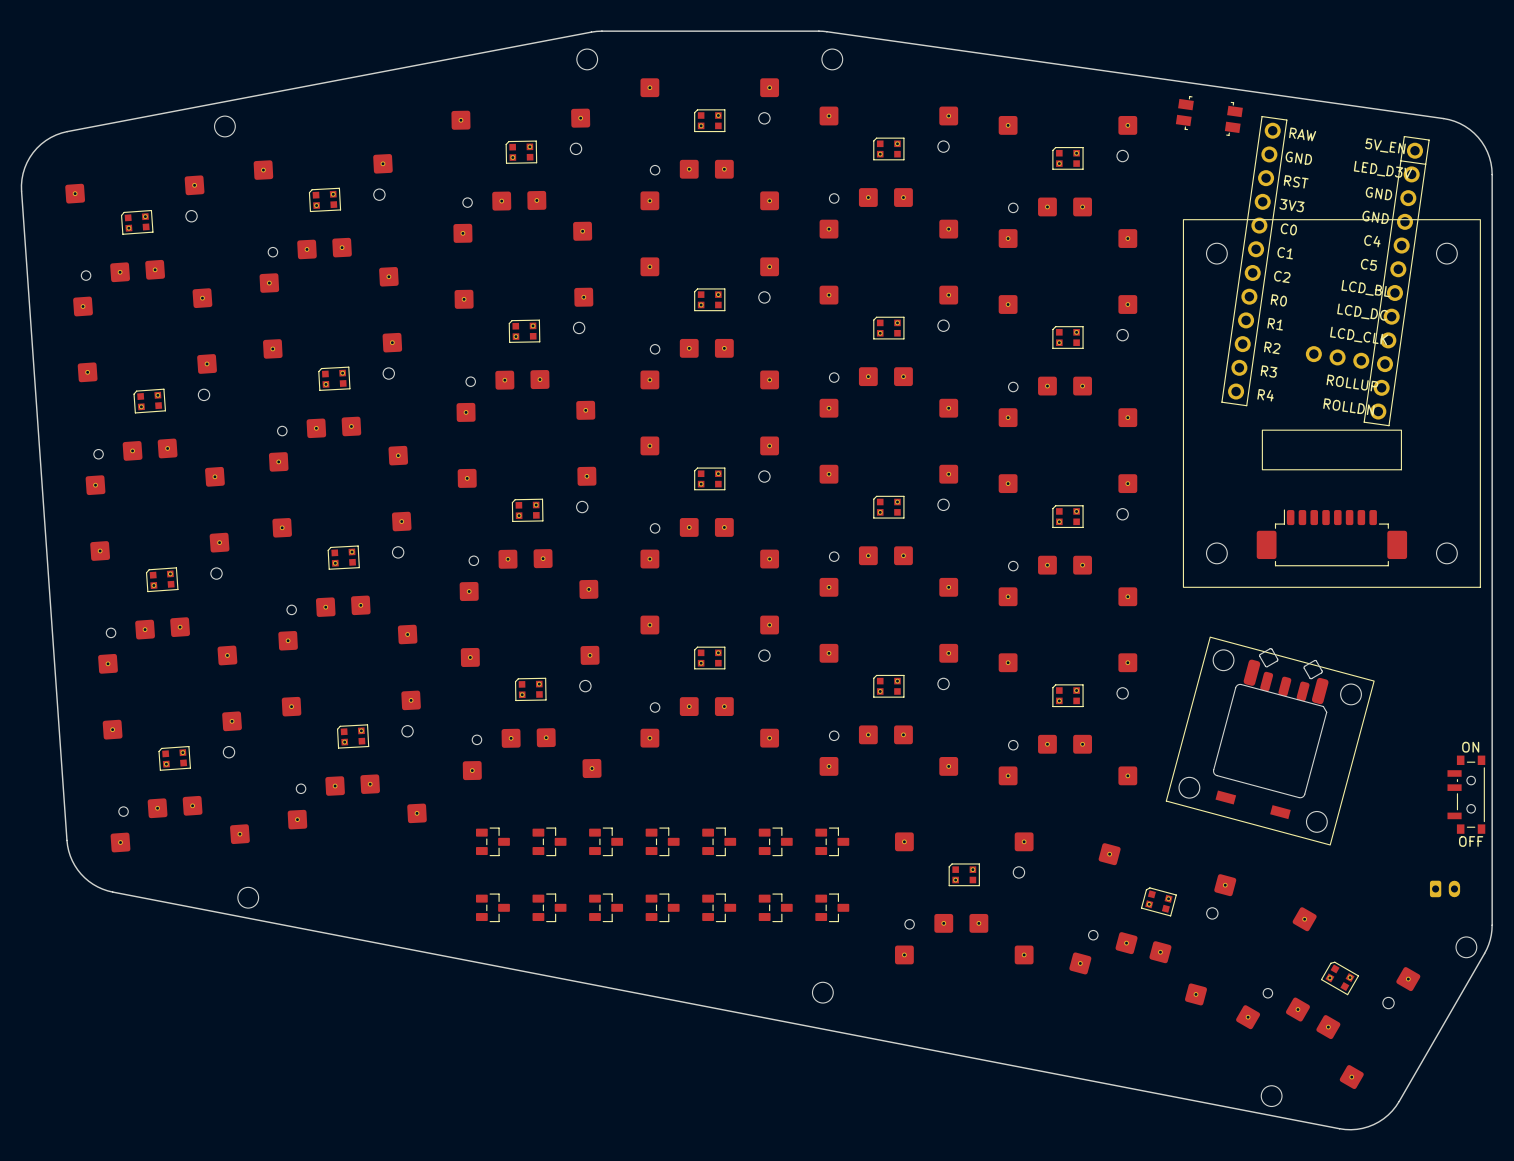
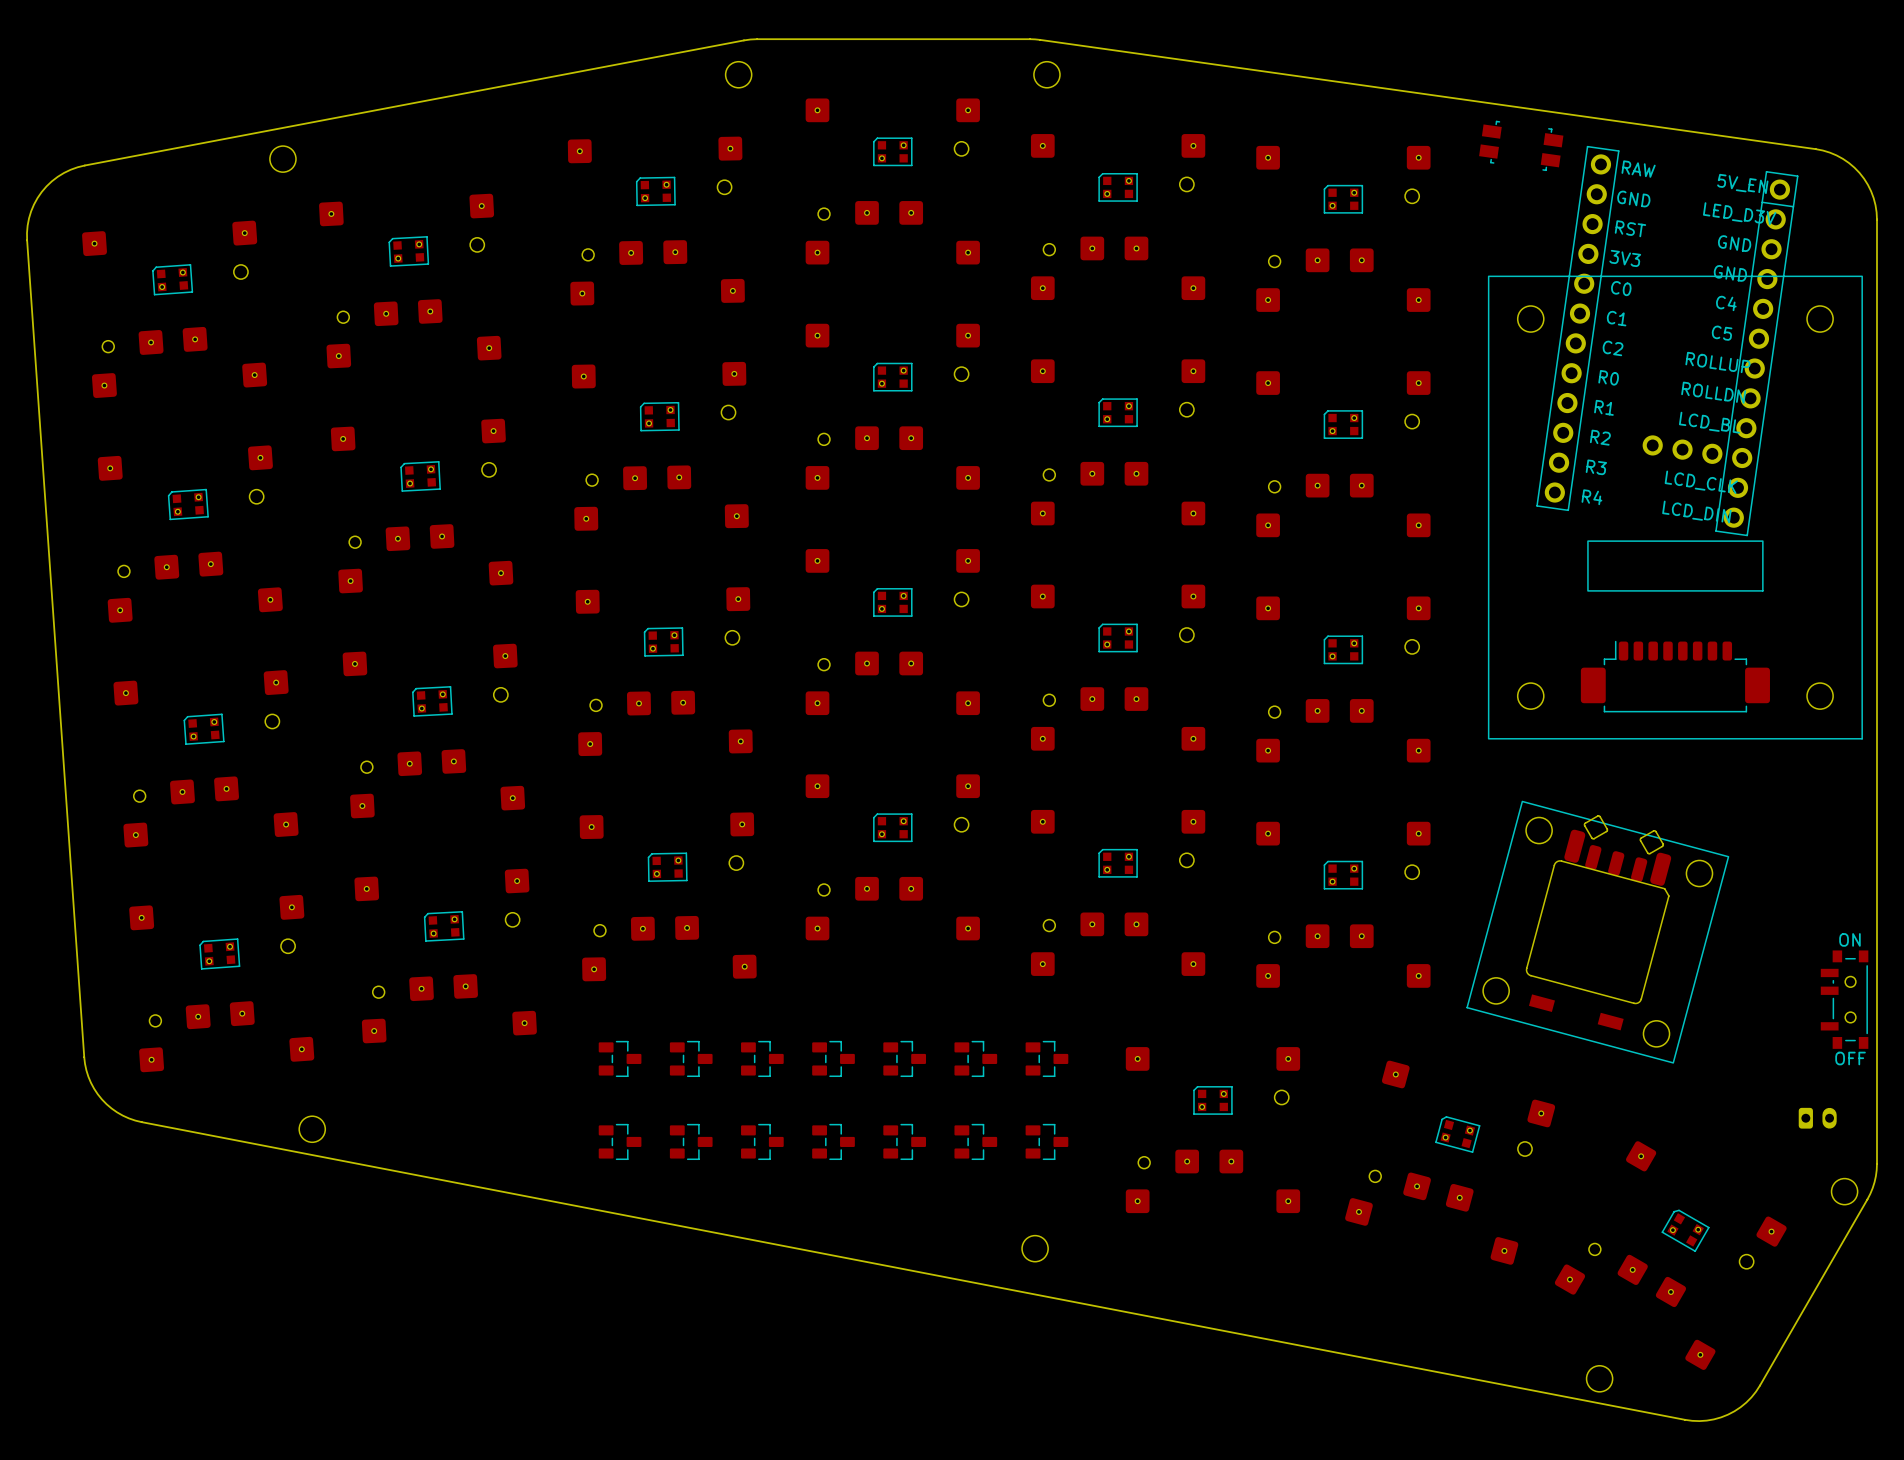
part text: LCD_BL (1365, 288) -> ROLLUP (1717, 362)
part text: LCD_DC (1362, 312) -> ROLLDN (1713, 392)
part text: LCD_CLK (1359, 335) -> LCD_BL (1709, 422)
part text: ROLLUP (1352, 382) -> LCD_CLK (1701, 482)
part text: ROLLDN (1348, 407) -> LCD_DIN (1696, 512)

